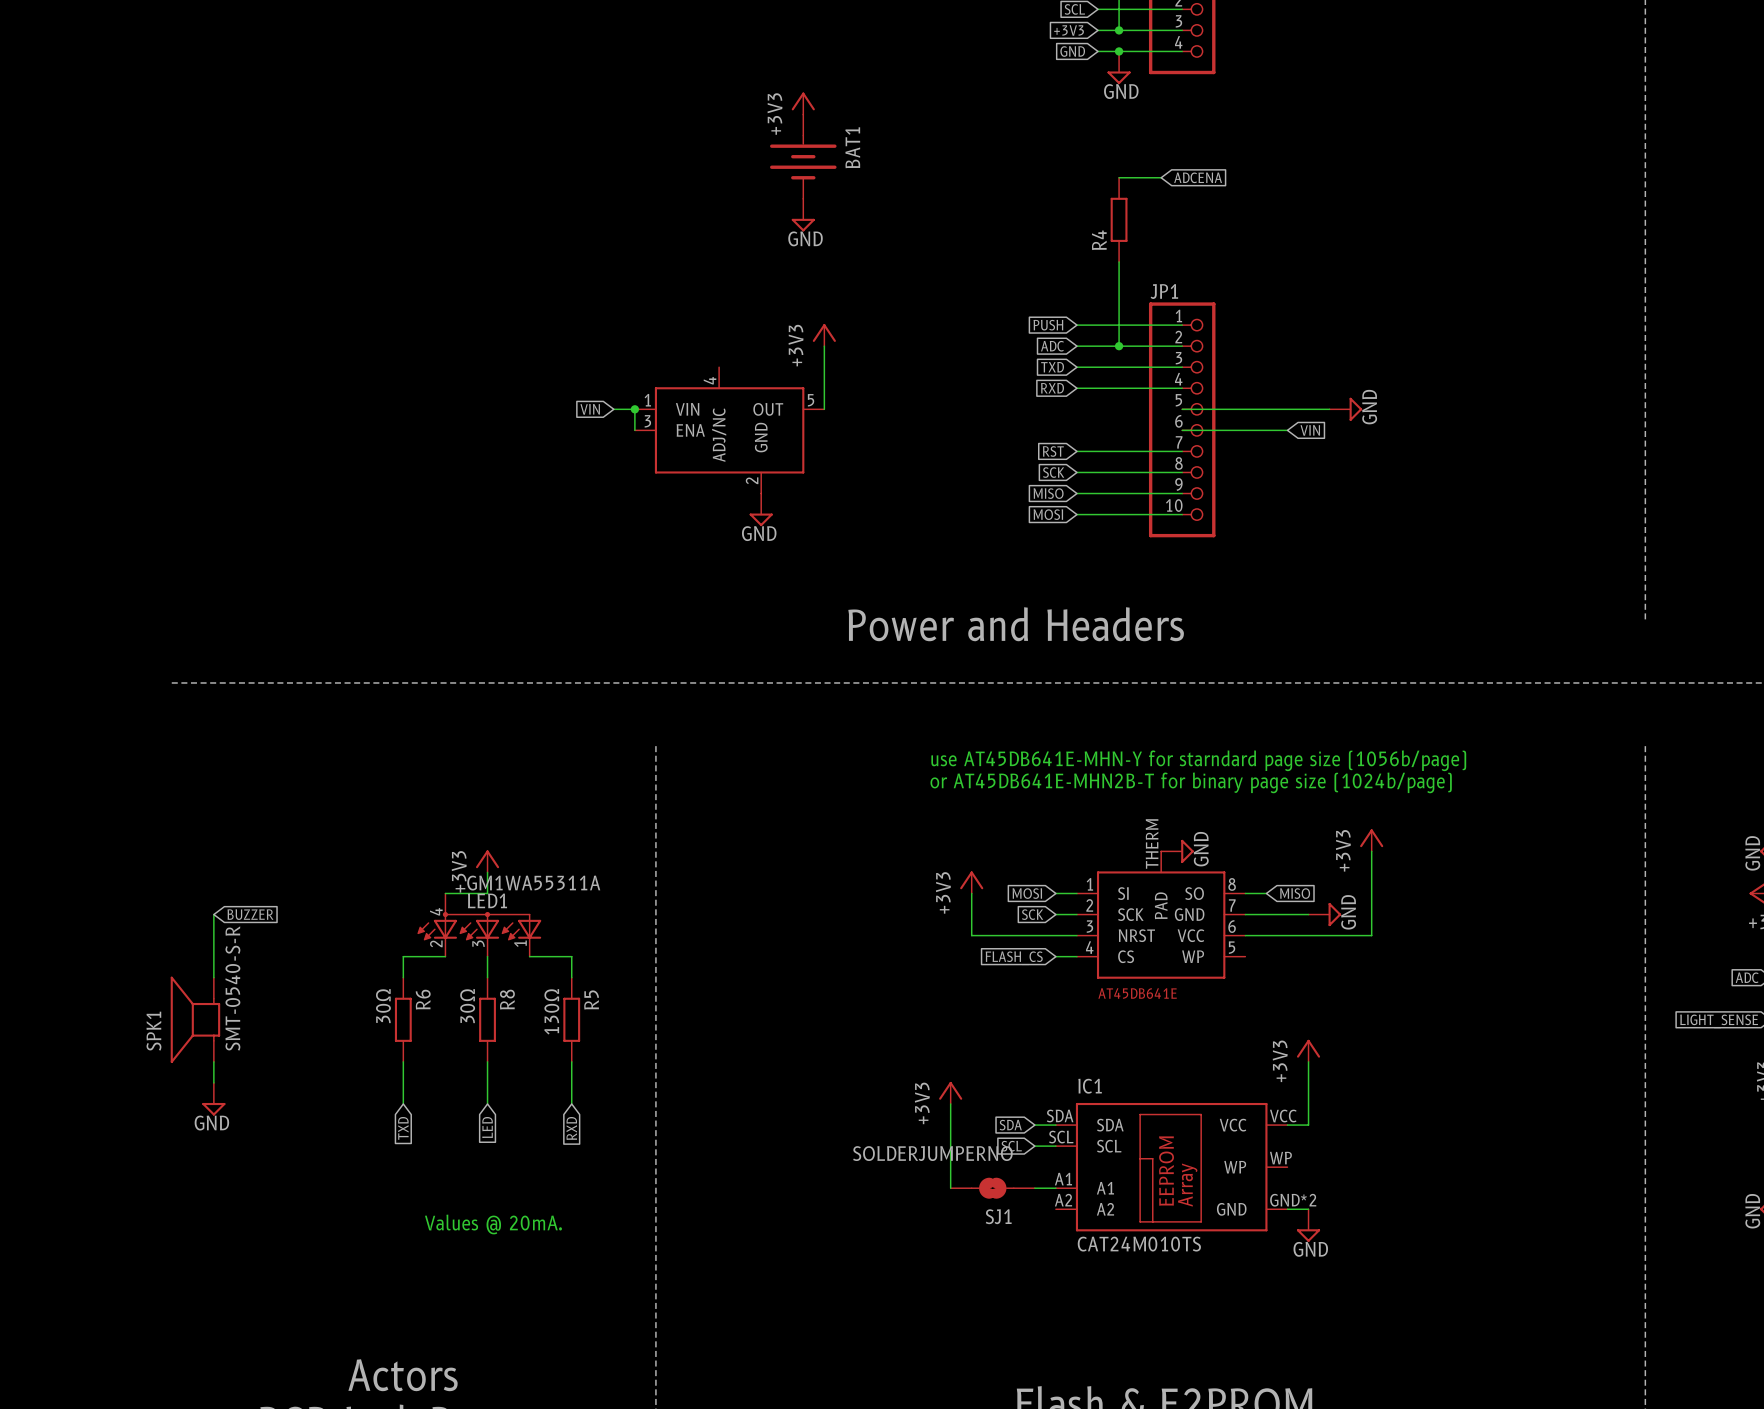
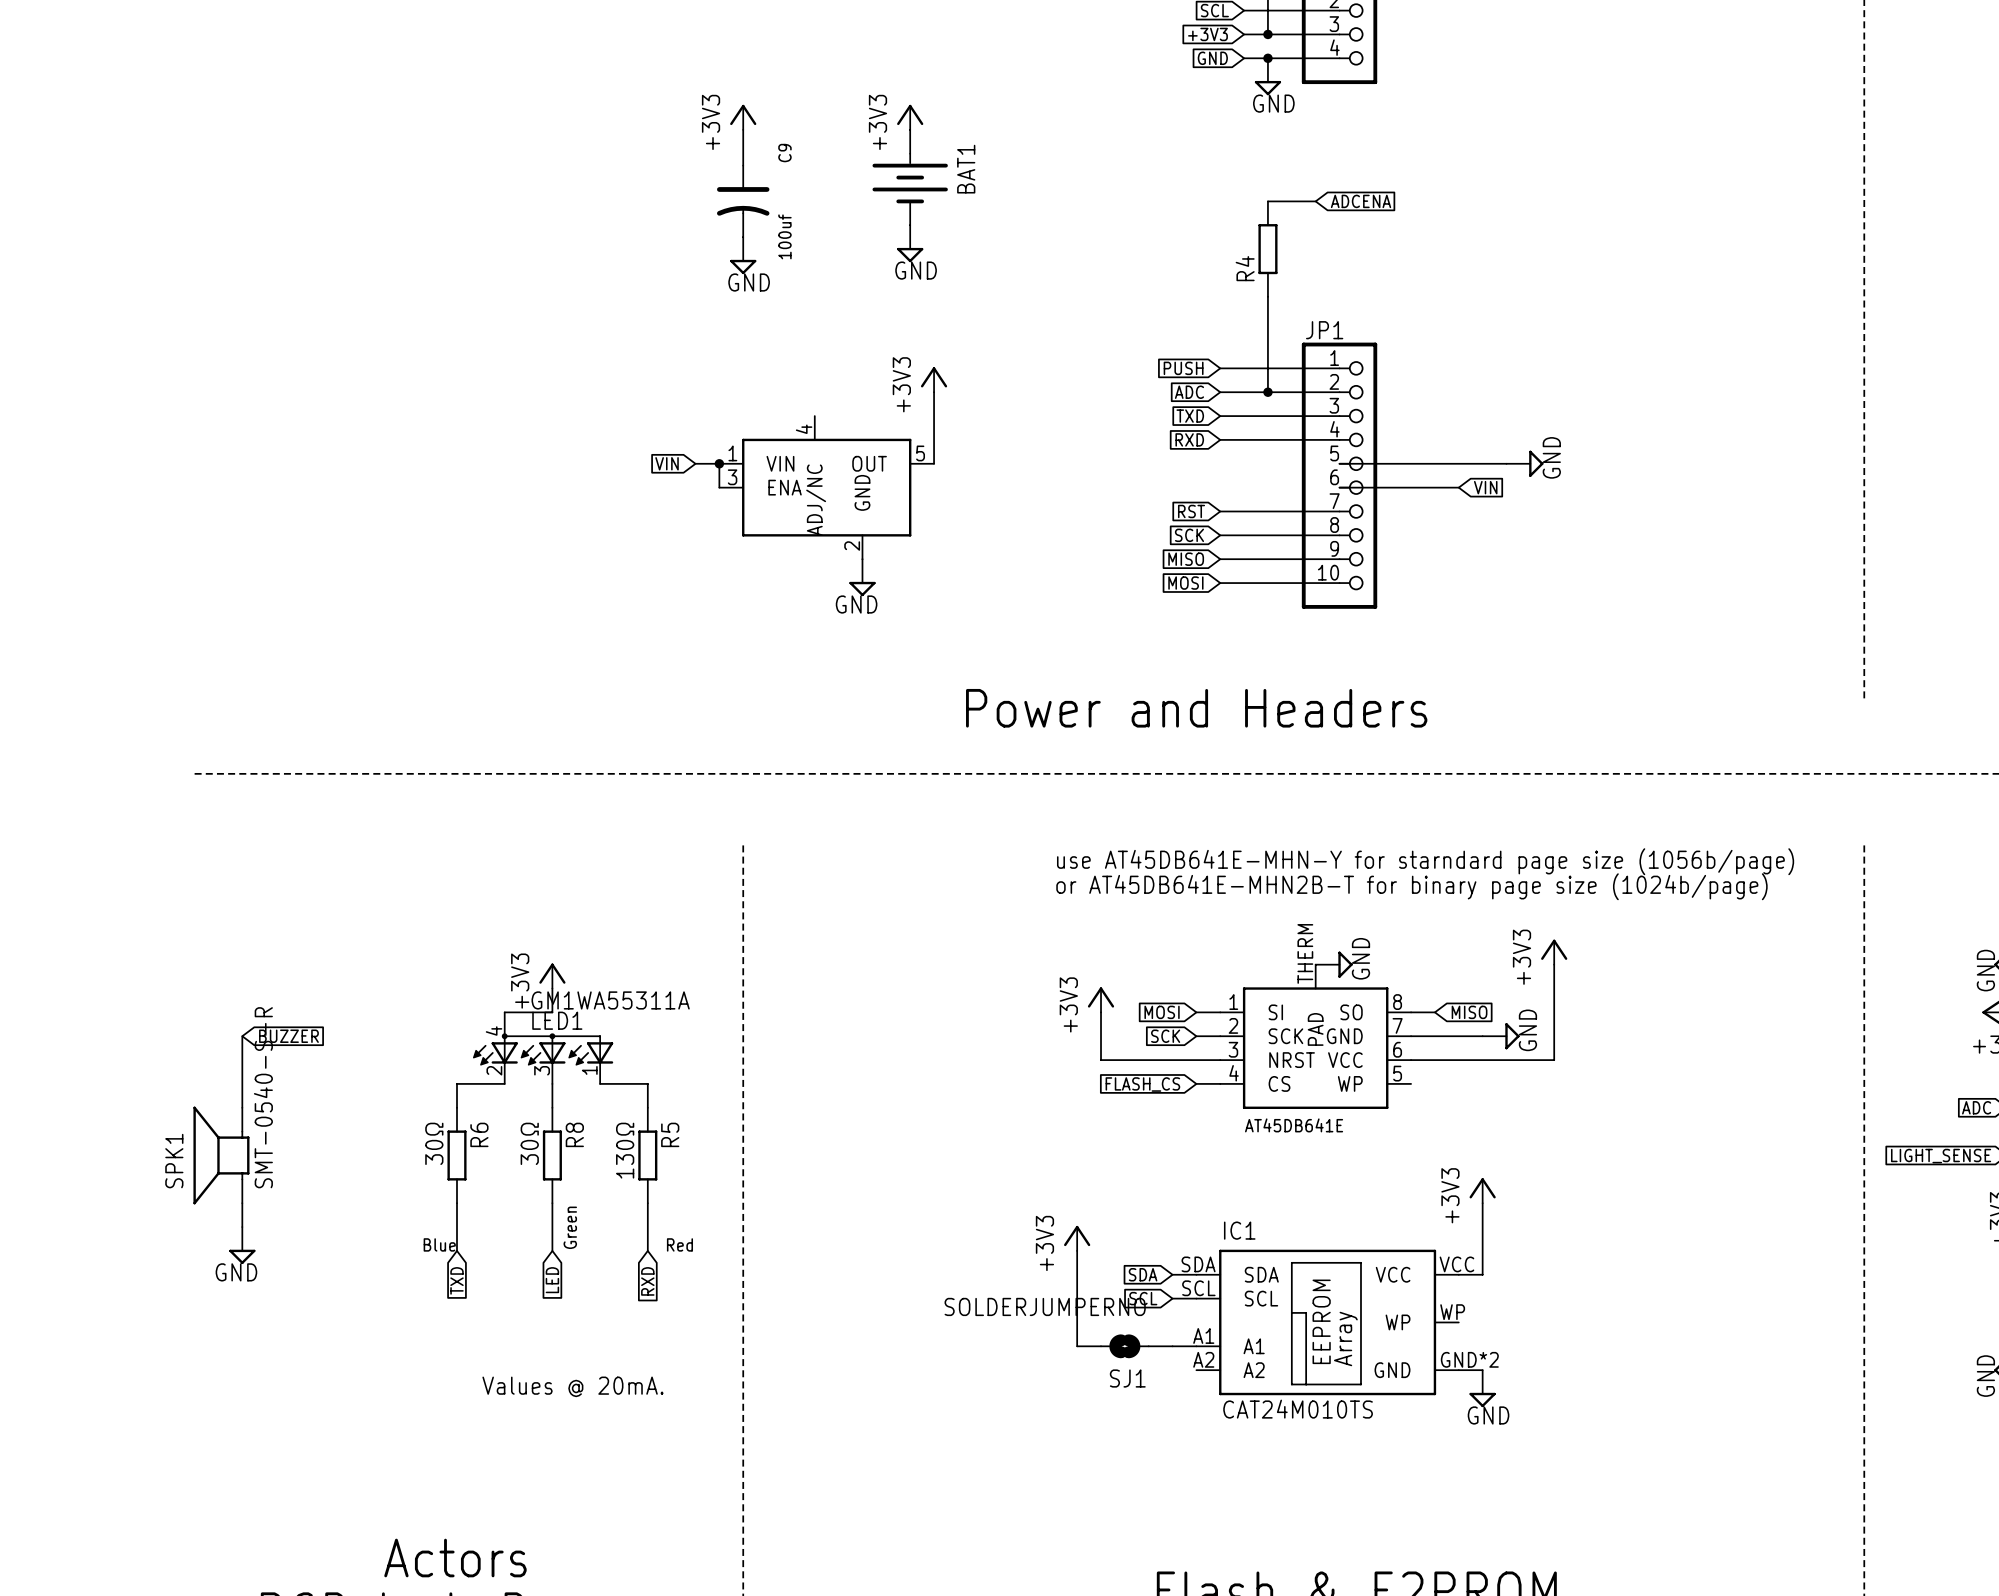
power symbol: none -> +3V3 (743, 117)
wire: none -> (743, 129) (743, 165)
C9: none -> 100uf (743, 201)
power symbol: none -> GND (743, 255)
text: none -> Green (570, 1227)
text: none -> Blue (439, 1244)
text: none -> Red (679, 1244)

